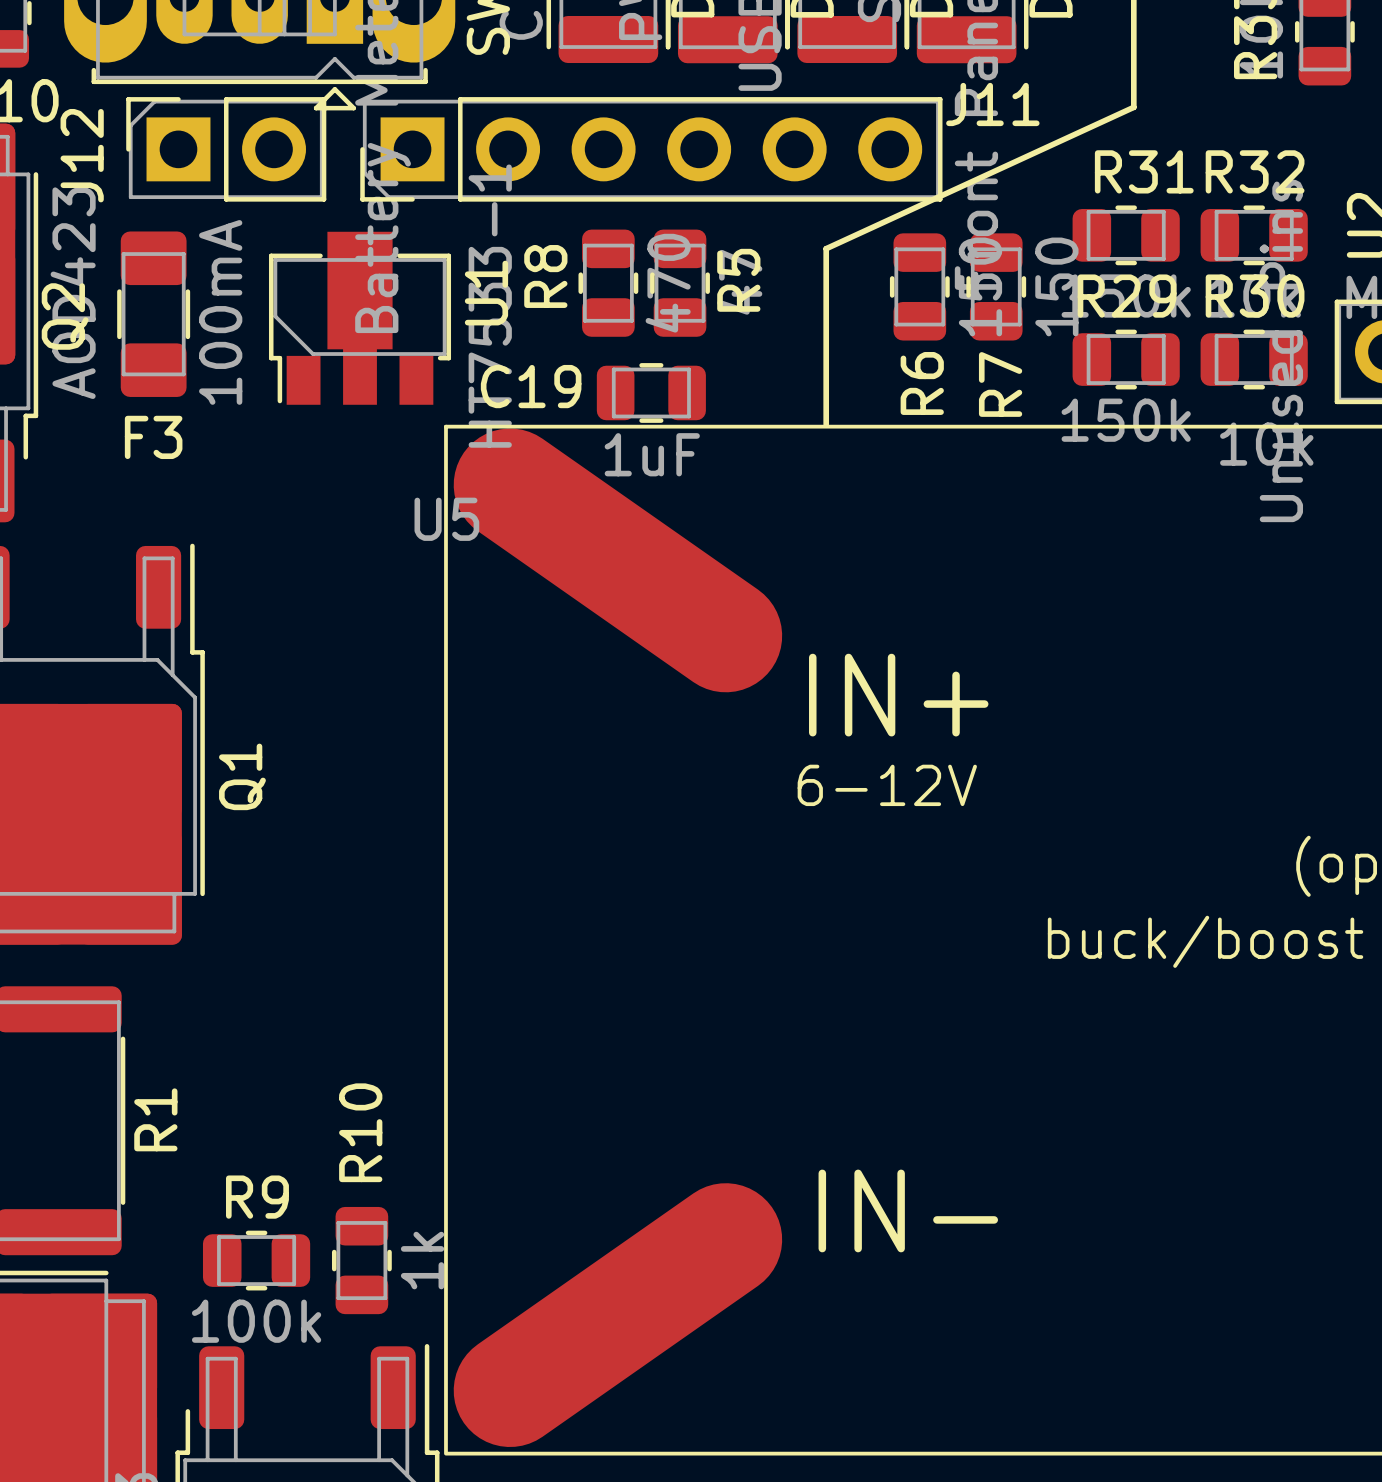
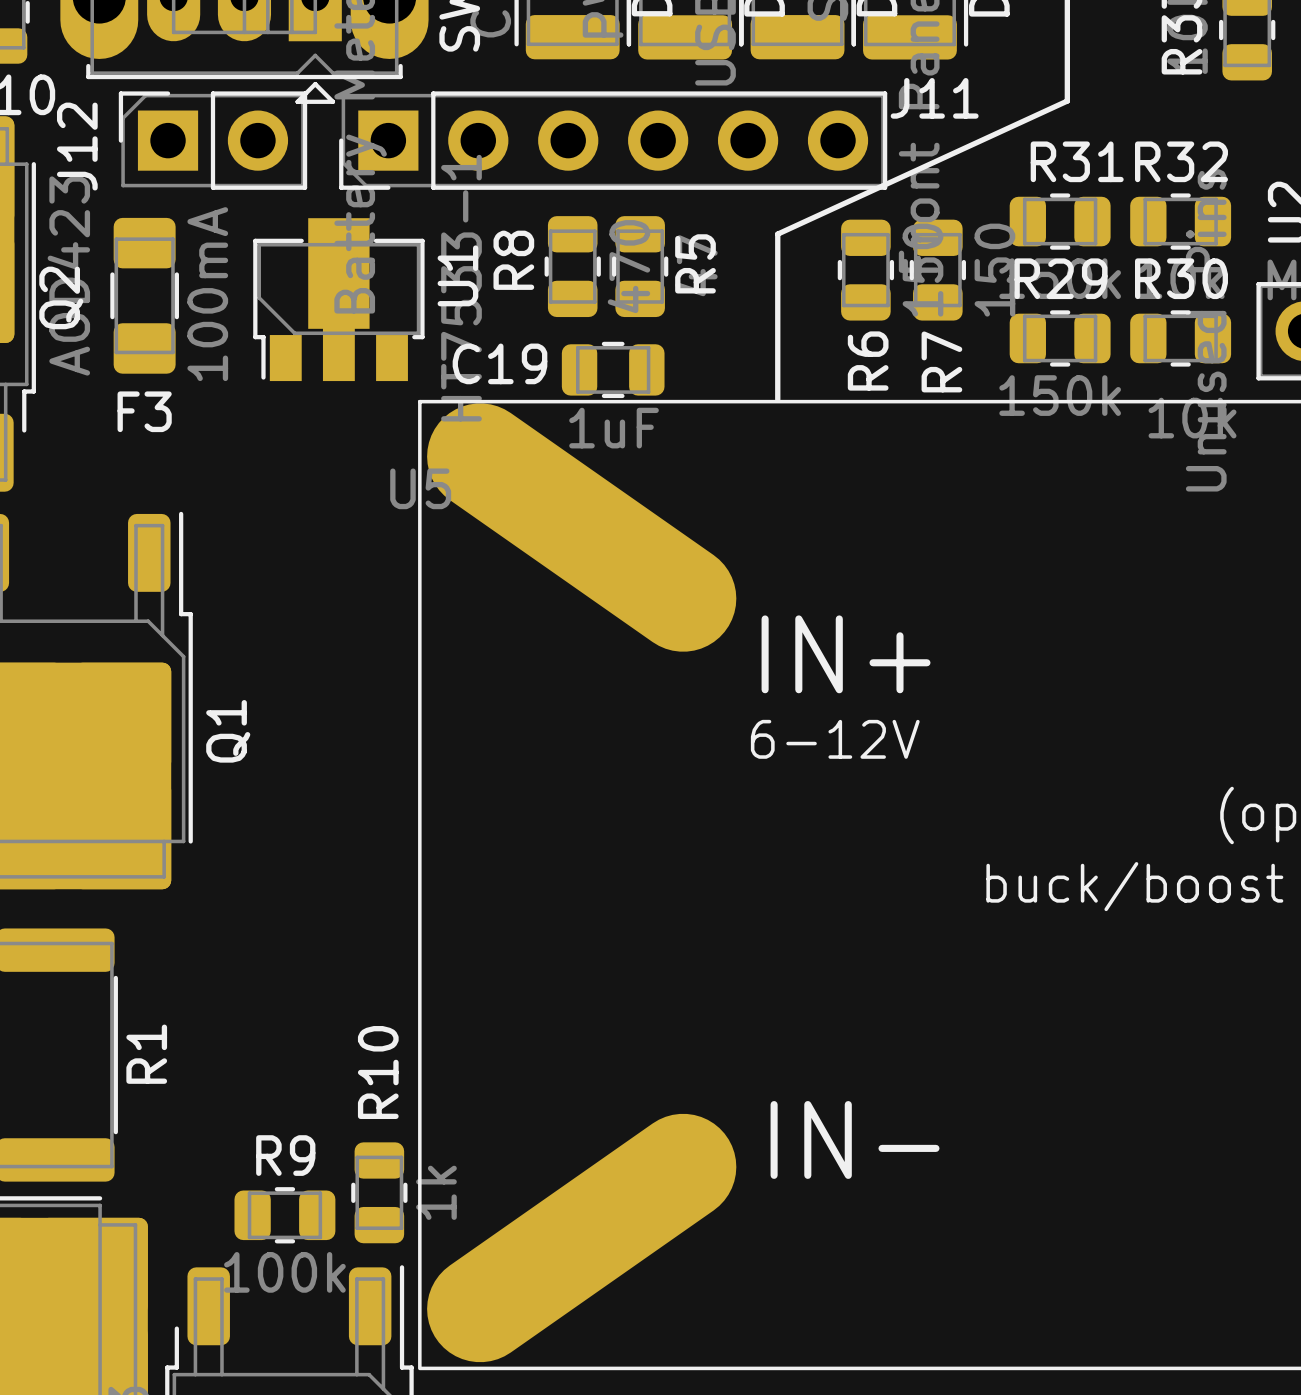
R9 position: (256, 1260) -> (284, 1215)
R10 position: (361, 1260) -> (379, 1192)

